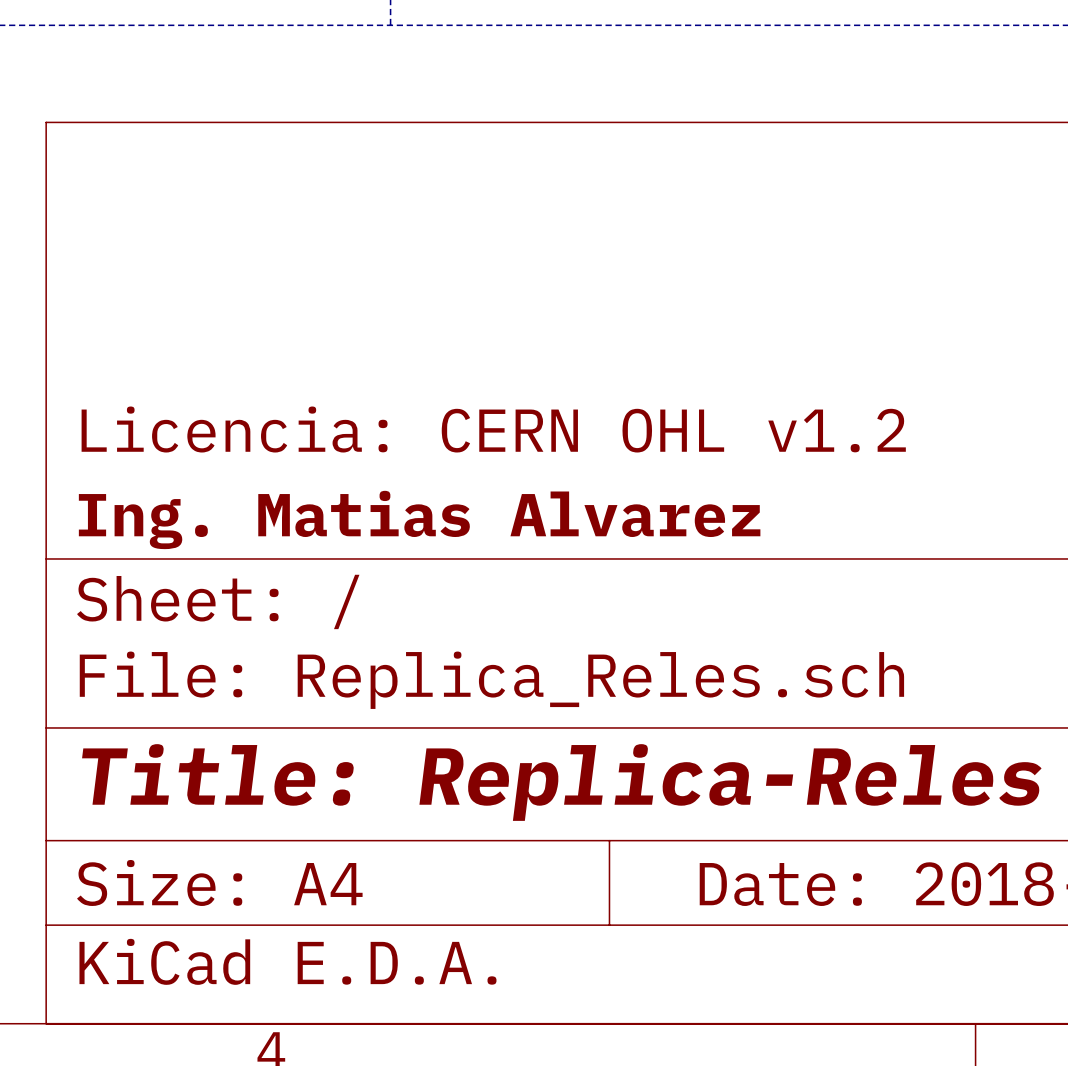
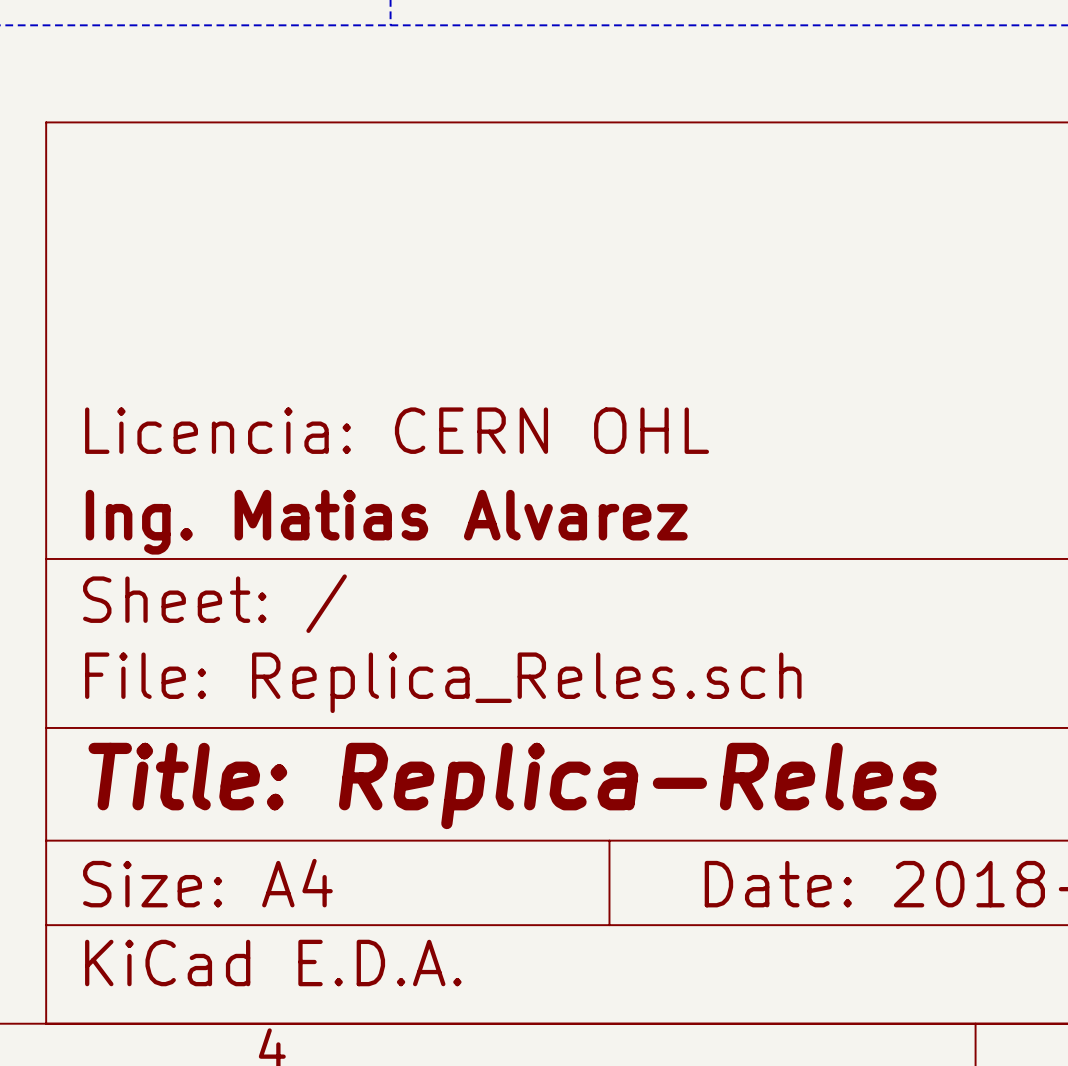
title block: Licencia: CERN OHL v1.2 (493, 429) -> Licencia: CERN OHL (397, 430)

